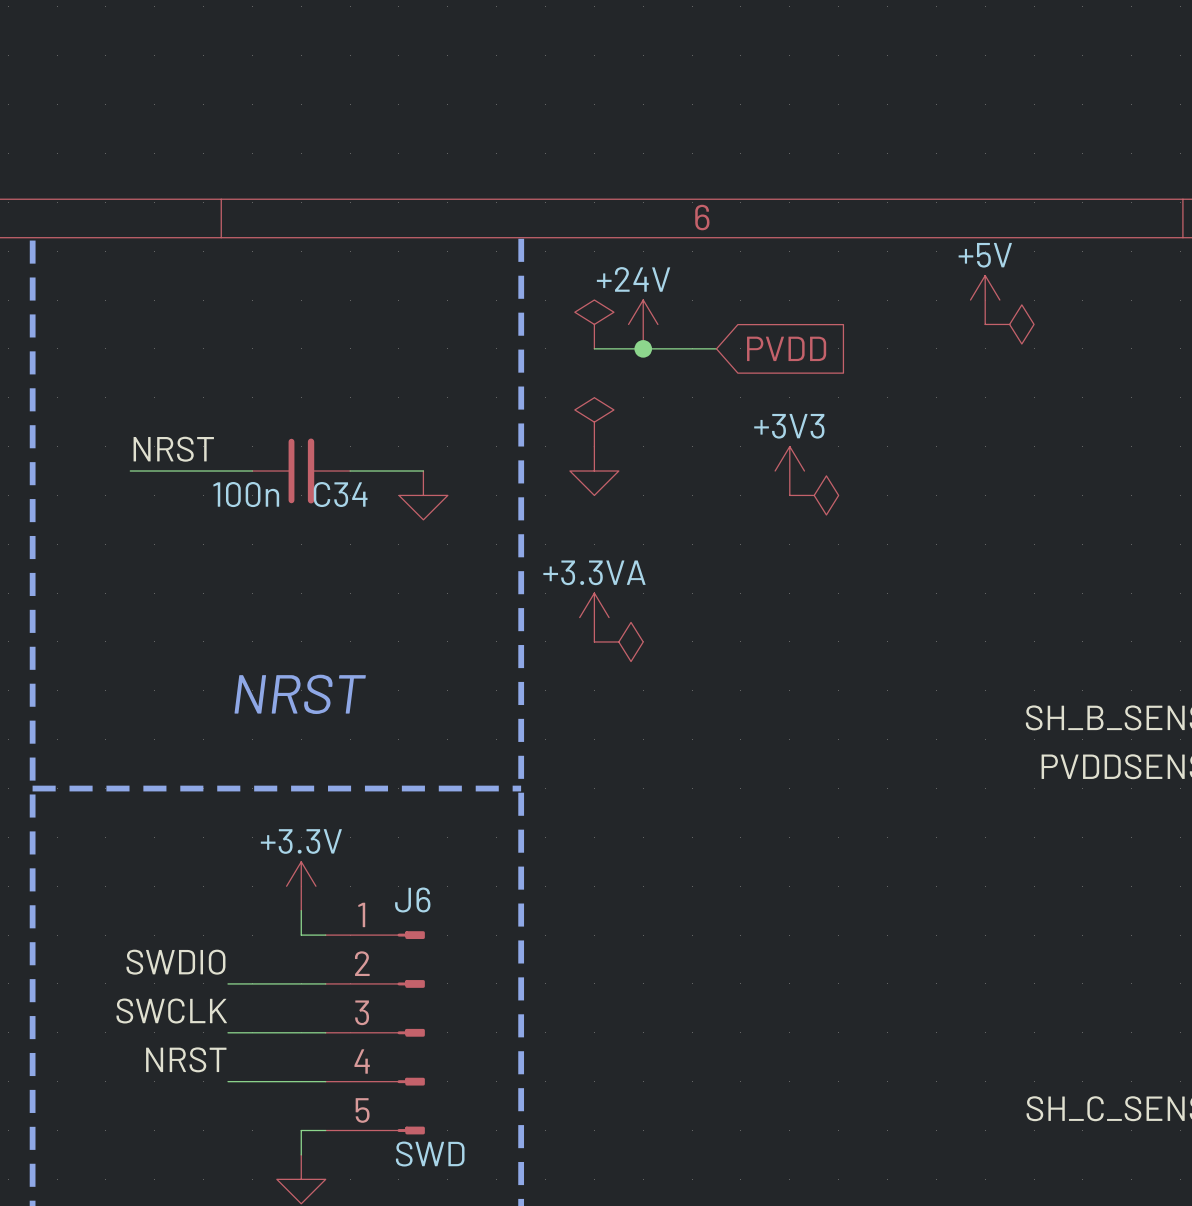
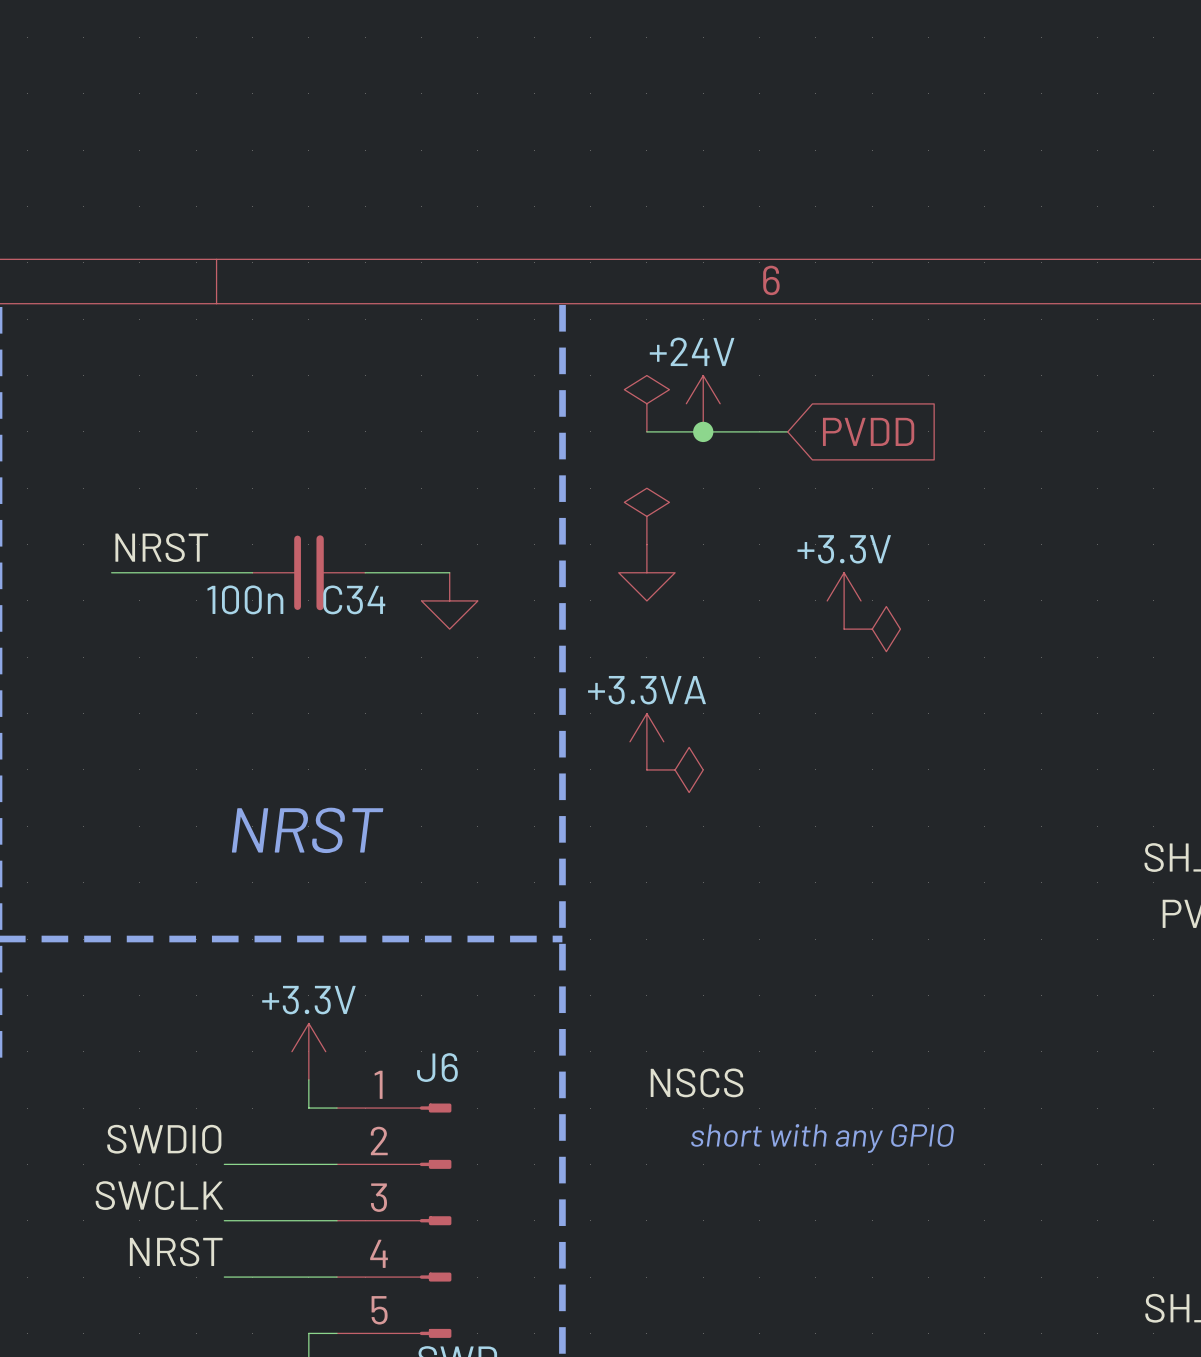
power symbol: +5V (985, 300) -> none
power symbol: (1009, 324) -> none
power symbol: +3V3 (789, 471) -> none
power symbol: none -> +3.3V (844, 600)
power symbol position: (814, 495) -> (872, 629)
label: none -> NSCS (697, 1082)
text: none -> short with any GPIO (822, 1138)

